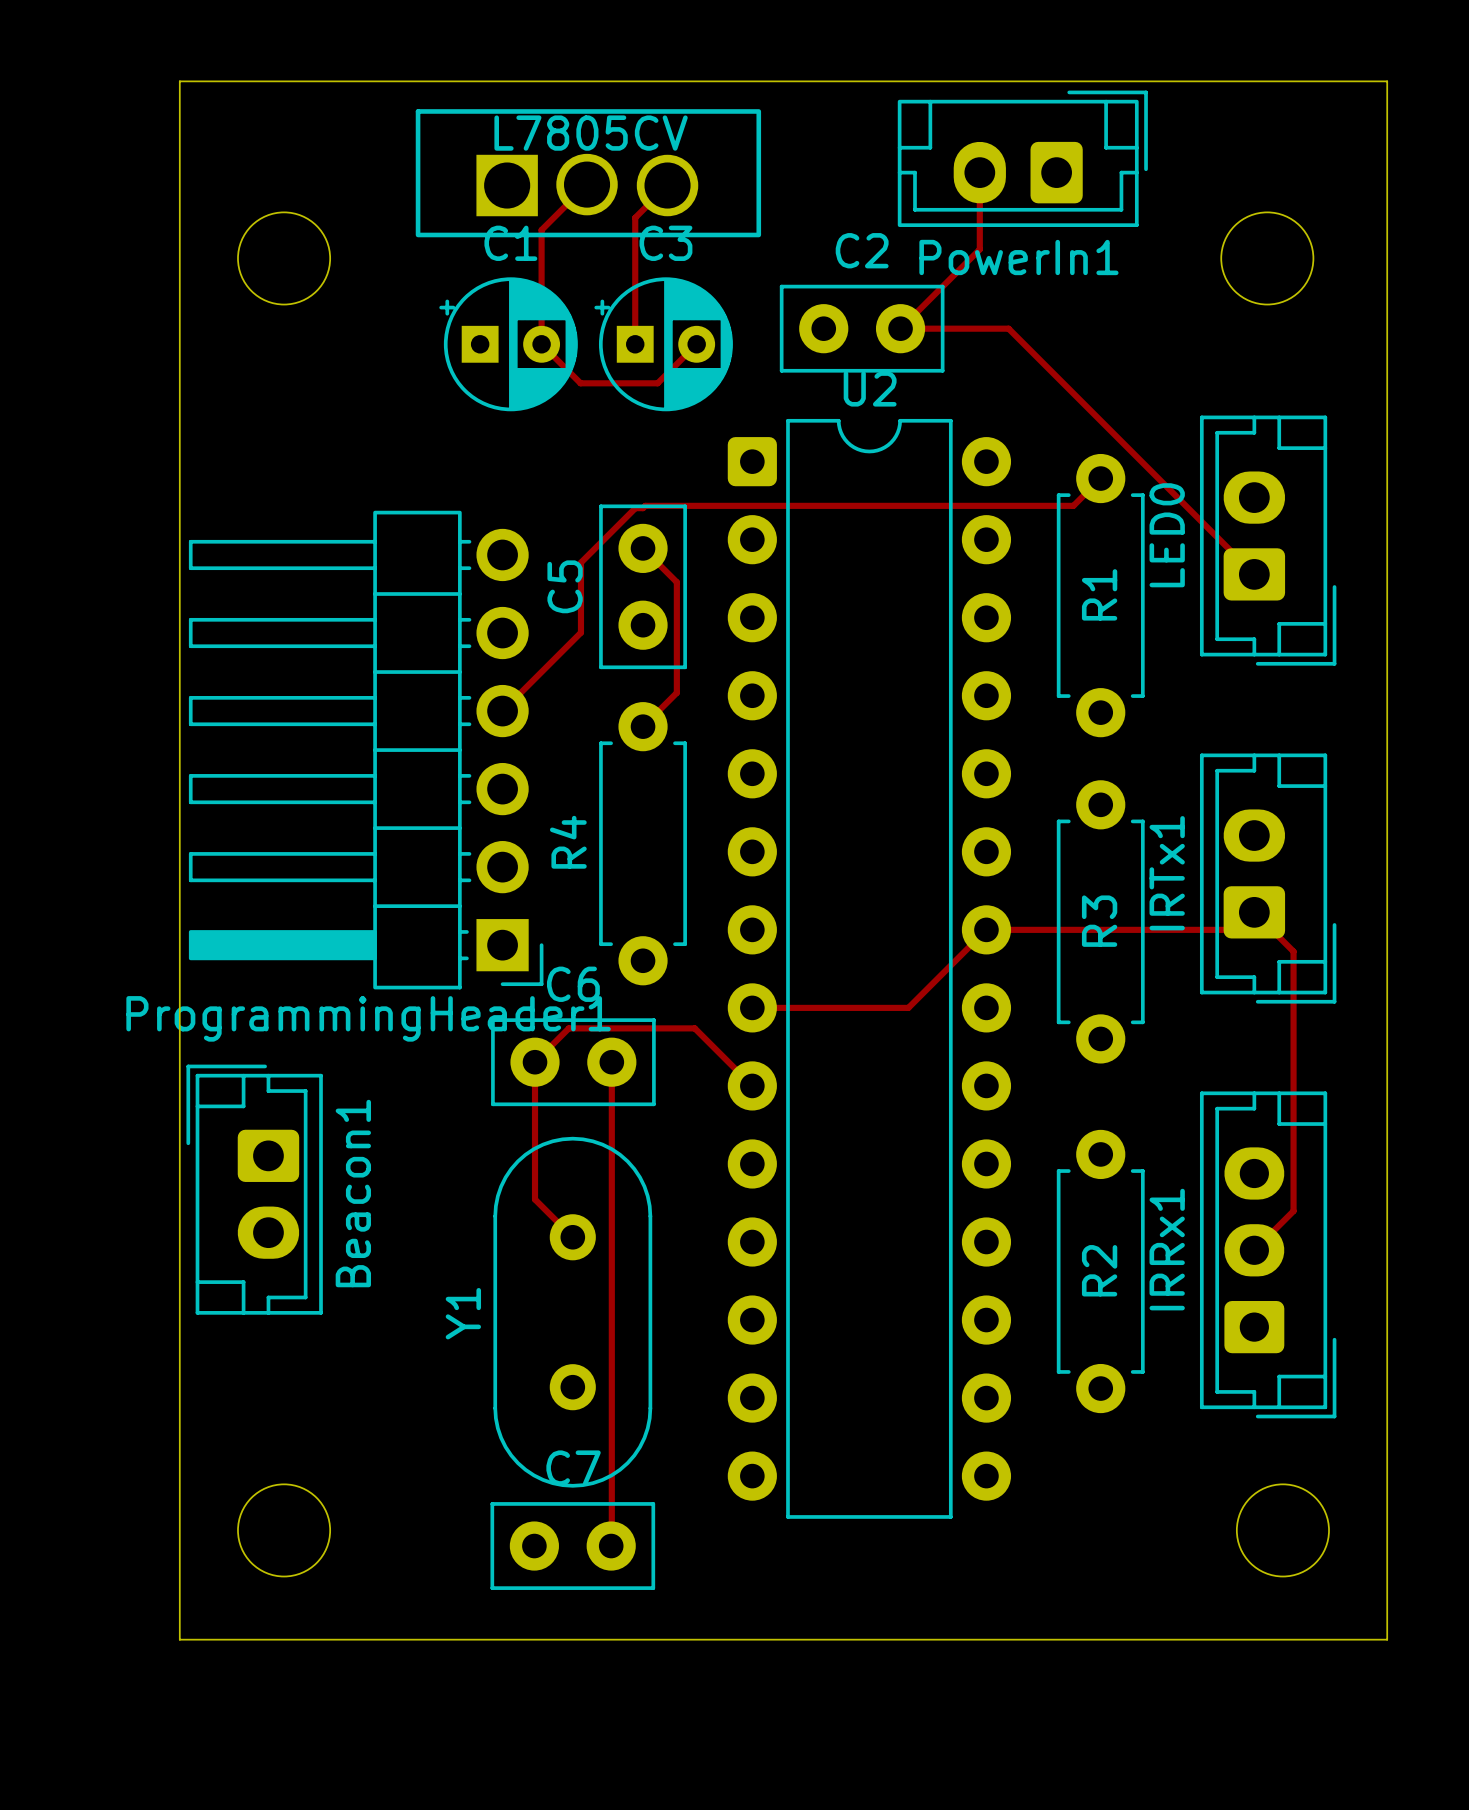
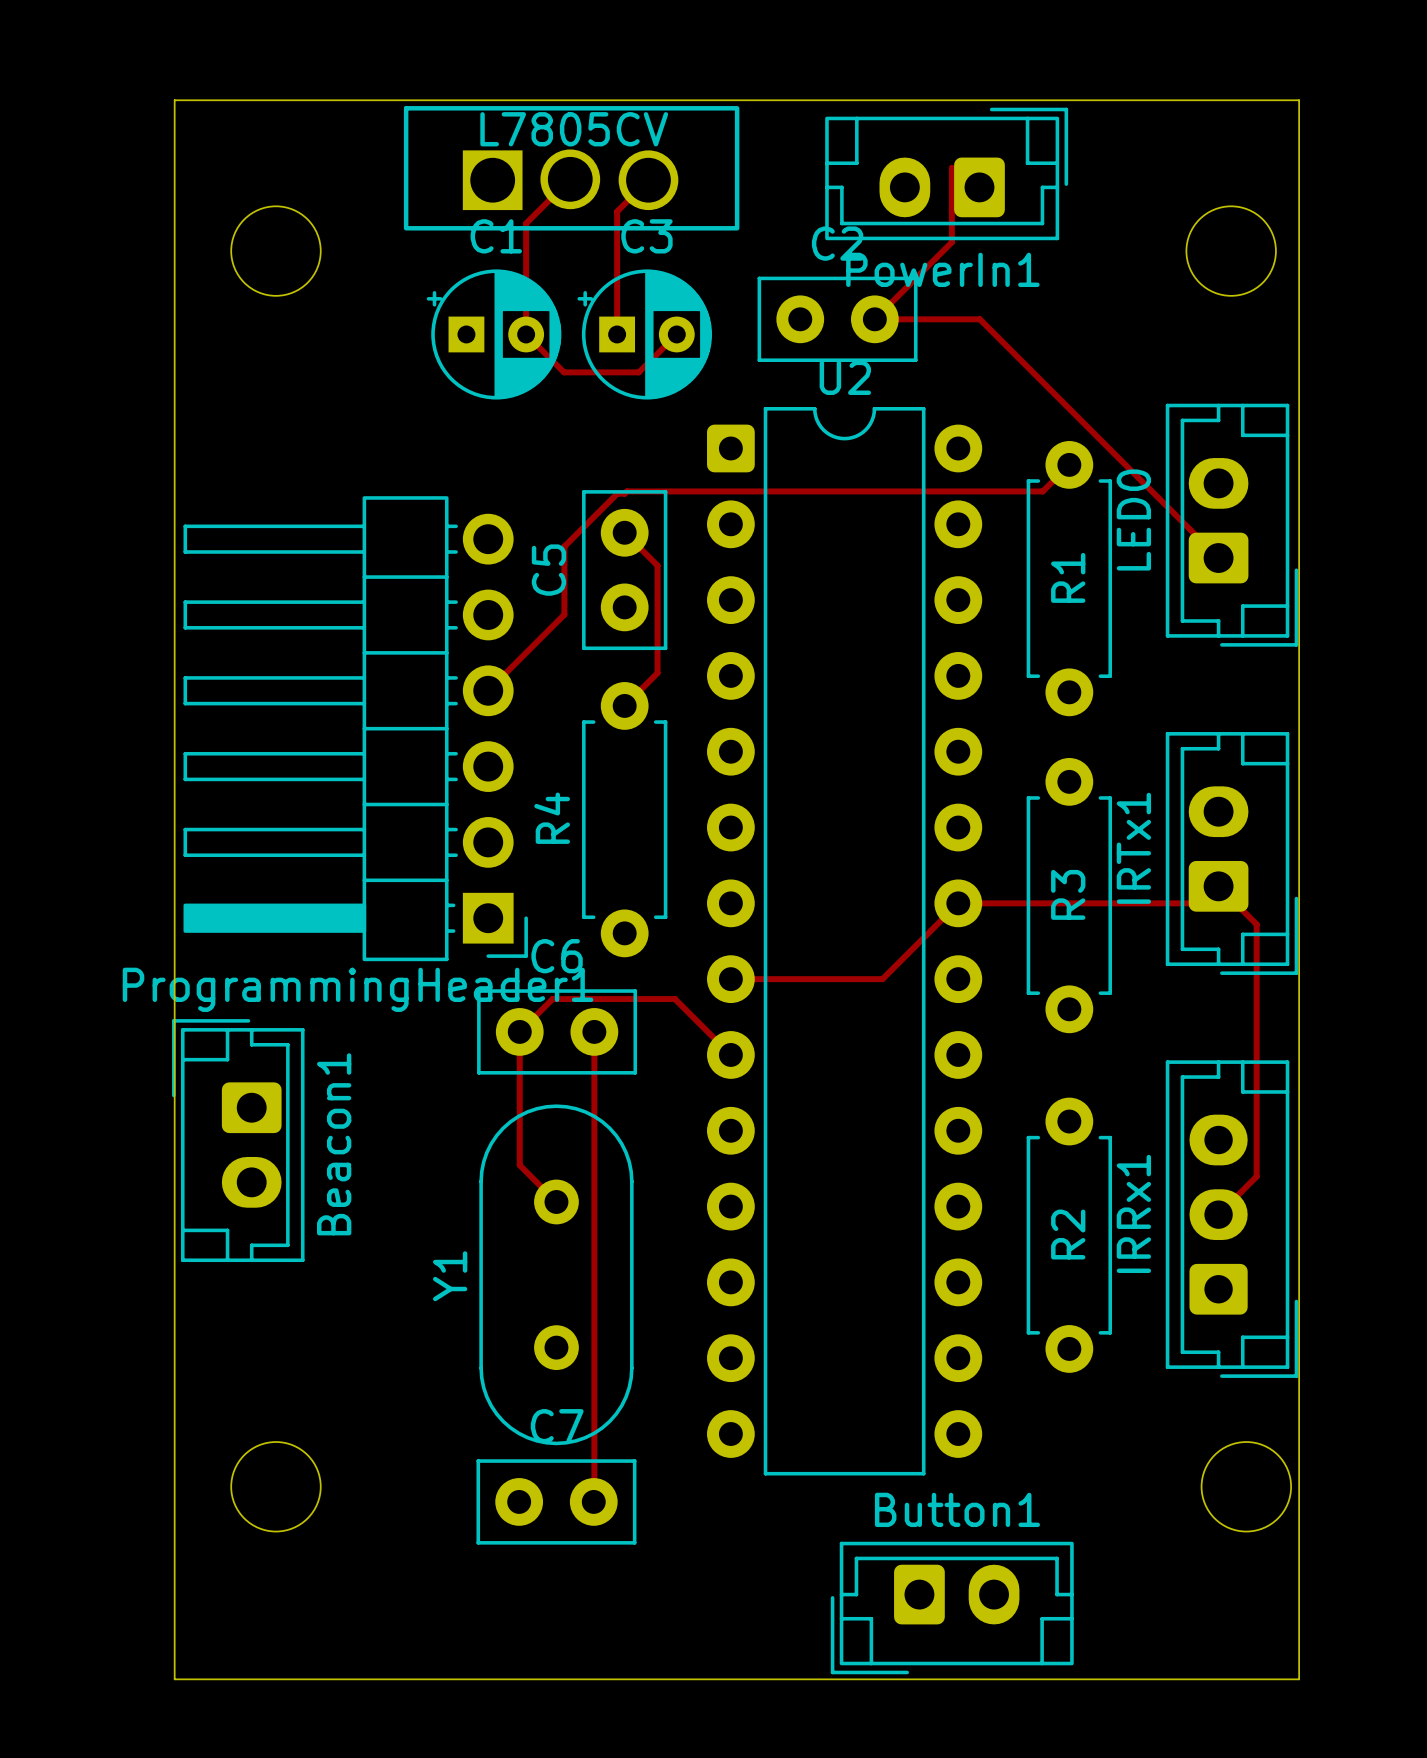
board edge: (179, 103) (179, 81) (1387, 81) (1387, 1639) (179, 1639) -> (174, 100) (1299, 100) (1299, 1679) (174, 1679) (174, 1592)
PowerIn1 position: (1022, 158) -> (946, 173)
Beacon1 position: (254, 1189) -> (238, 1140)
Button1: none -> (952, 1608)

